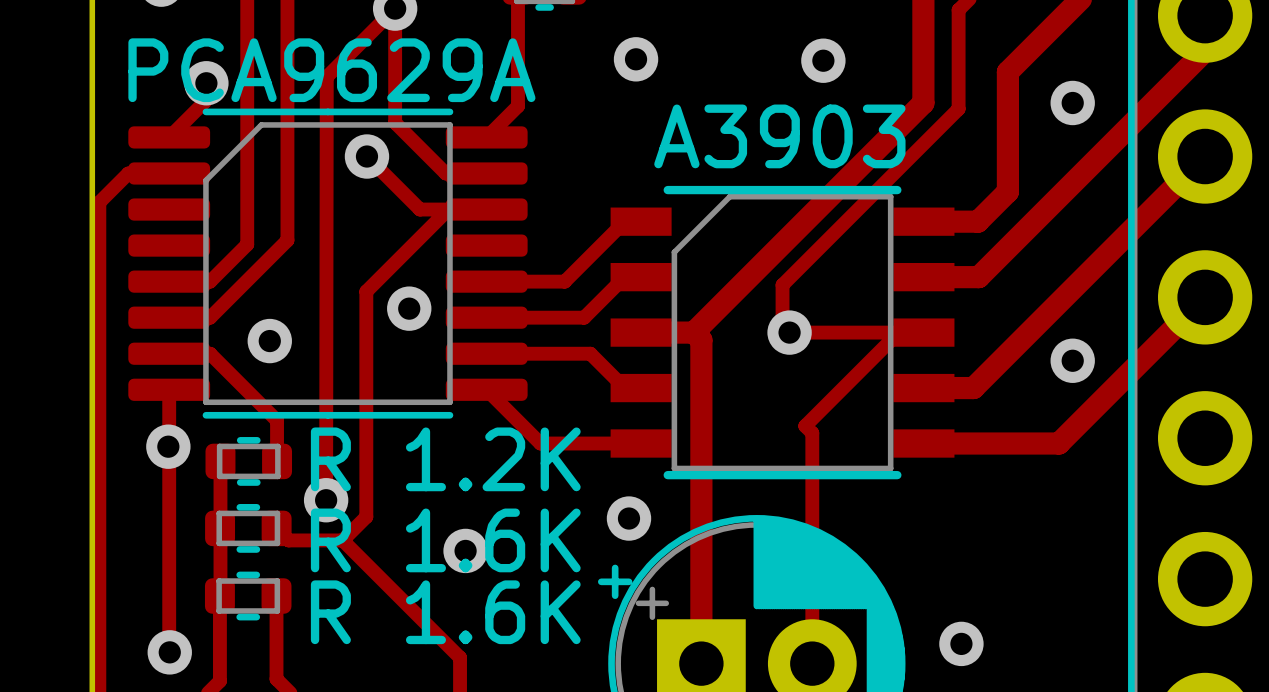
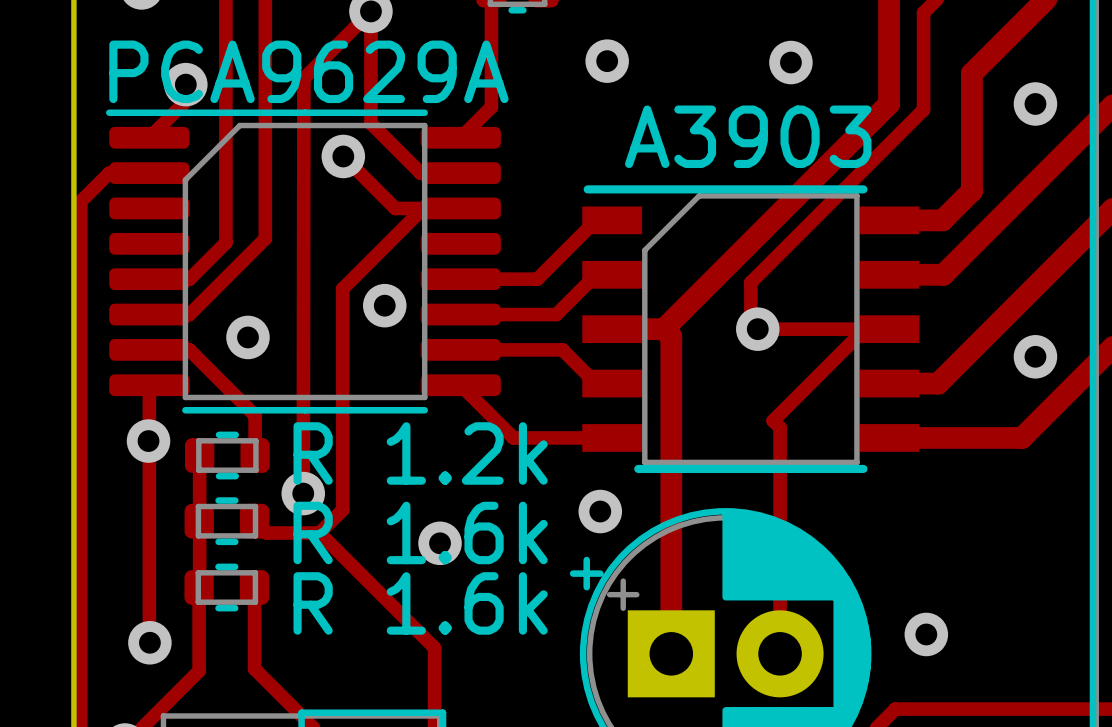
PCA9629A footprint: [128, 108, 528, 419] -> [105, 109, 501, 414]
A3903 footprint: [610, 185, 955, 480] -> [582, 185, 920, 474]
R 1.2K name: R 1.2K (445, 459) -> R 1.2k (420, 453)
R 1.6K name: R 1.6K (445, 540) -> R 1.6k (420, 532)
R 1.6K name: R 1.6K (445, 612) -> R 1.6k (420, 603)

